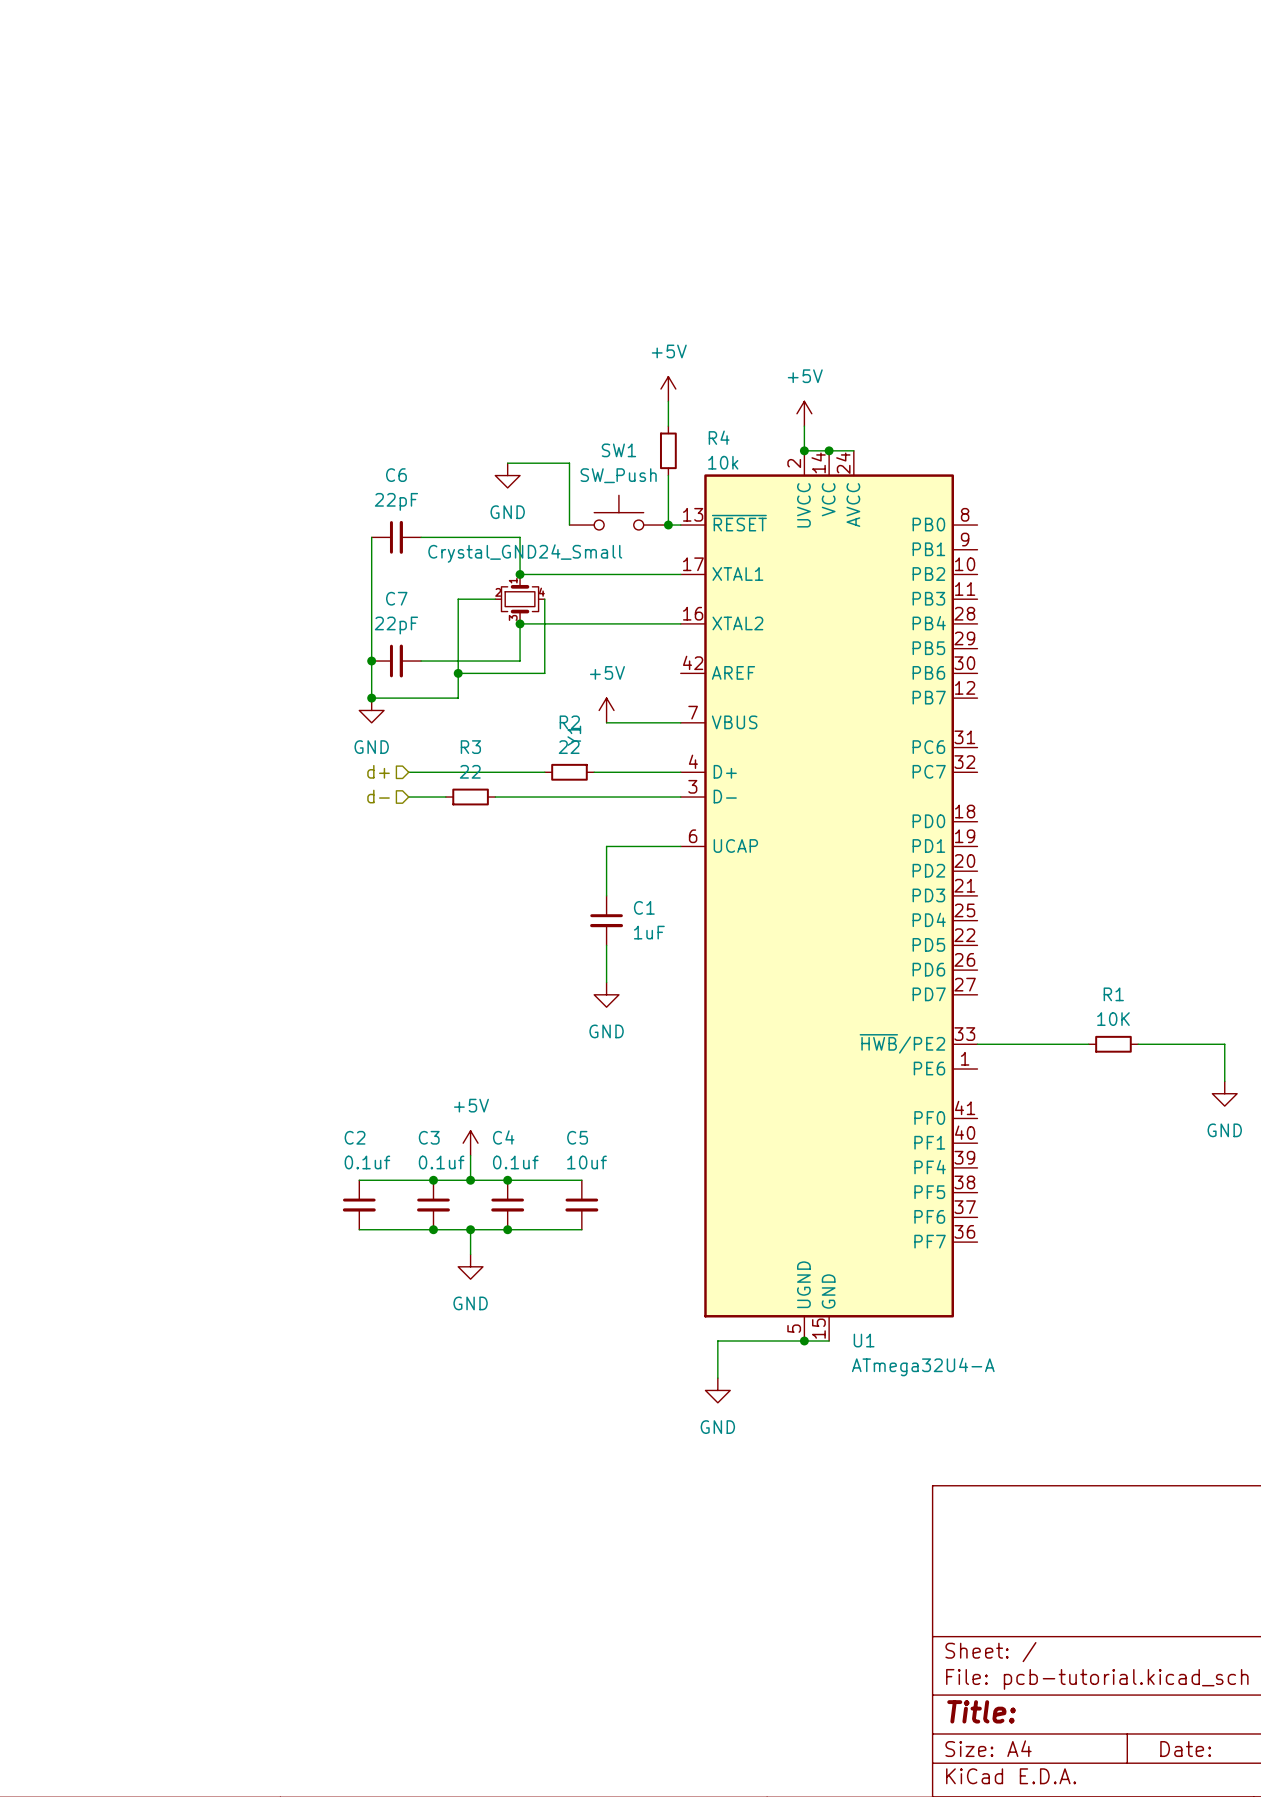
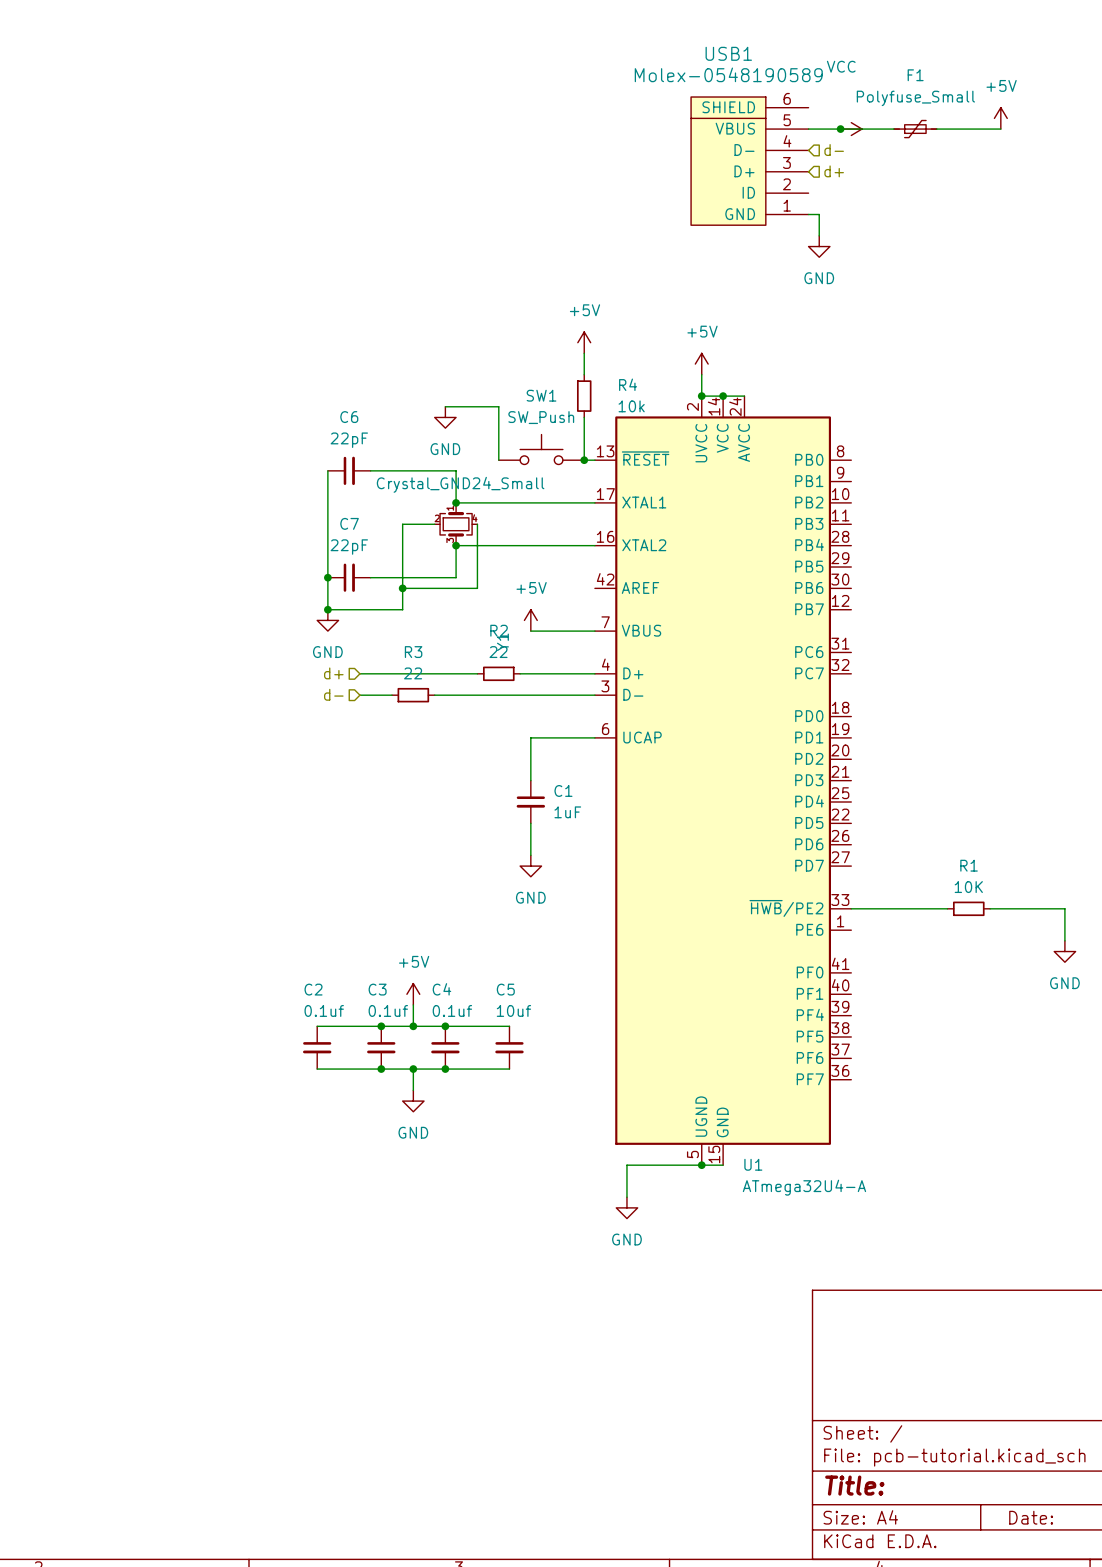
power symbol: none -> +5V (1000, 118)
wire: none -> (808, 129) (894, 129)
junction: none -> (840, 129)
power symbol: none -> VCC (851, 129)
F1: none -> Polyfuse_Small (915, 129)
wire: none -> (936, 129) (1000, 129)
hierarchical label: none -> d- (834, 150)
USB1: none -> Molex-0548190589 (749, 161)
hierarchical label: none -> d+ (834, 171)
wire: none -> (808, 214) (819, 214) (819, 235)
power symbol: none -> GND (819, 246)

